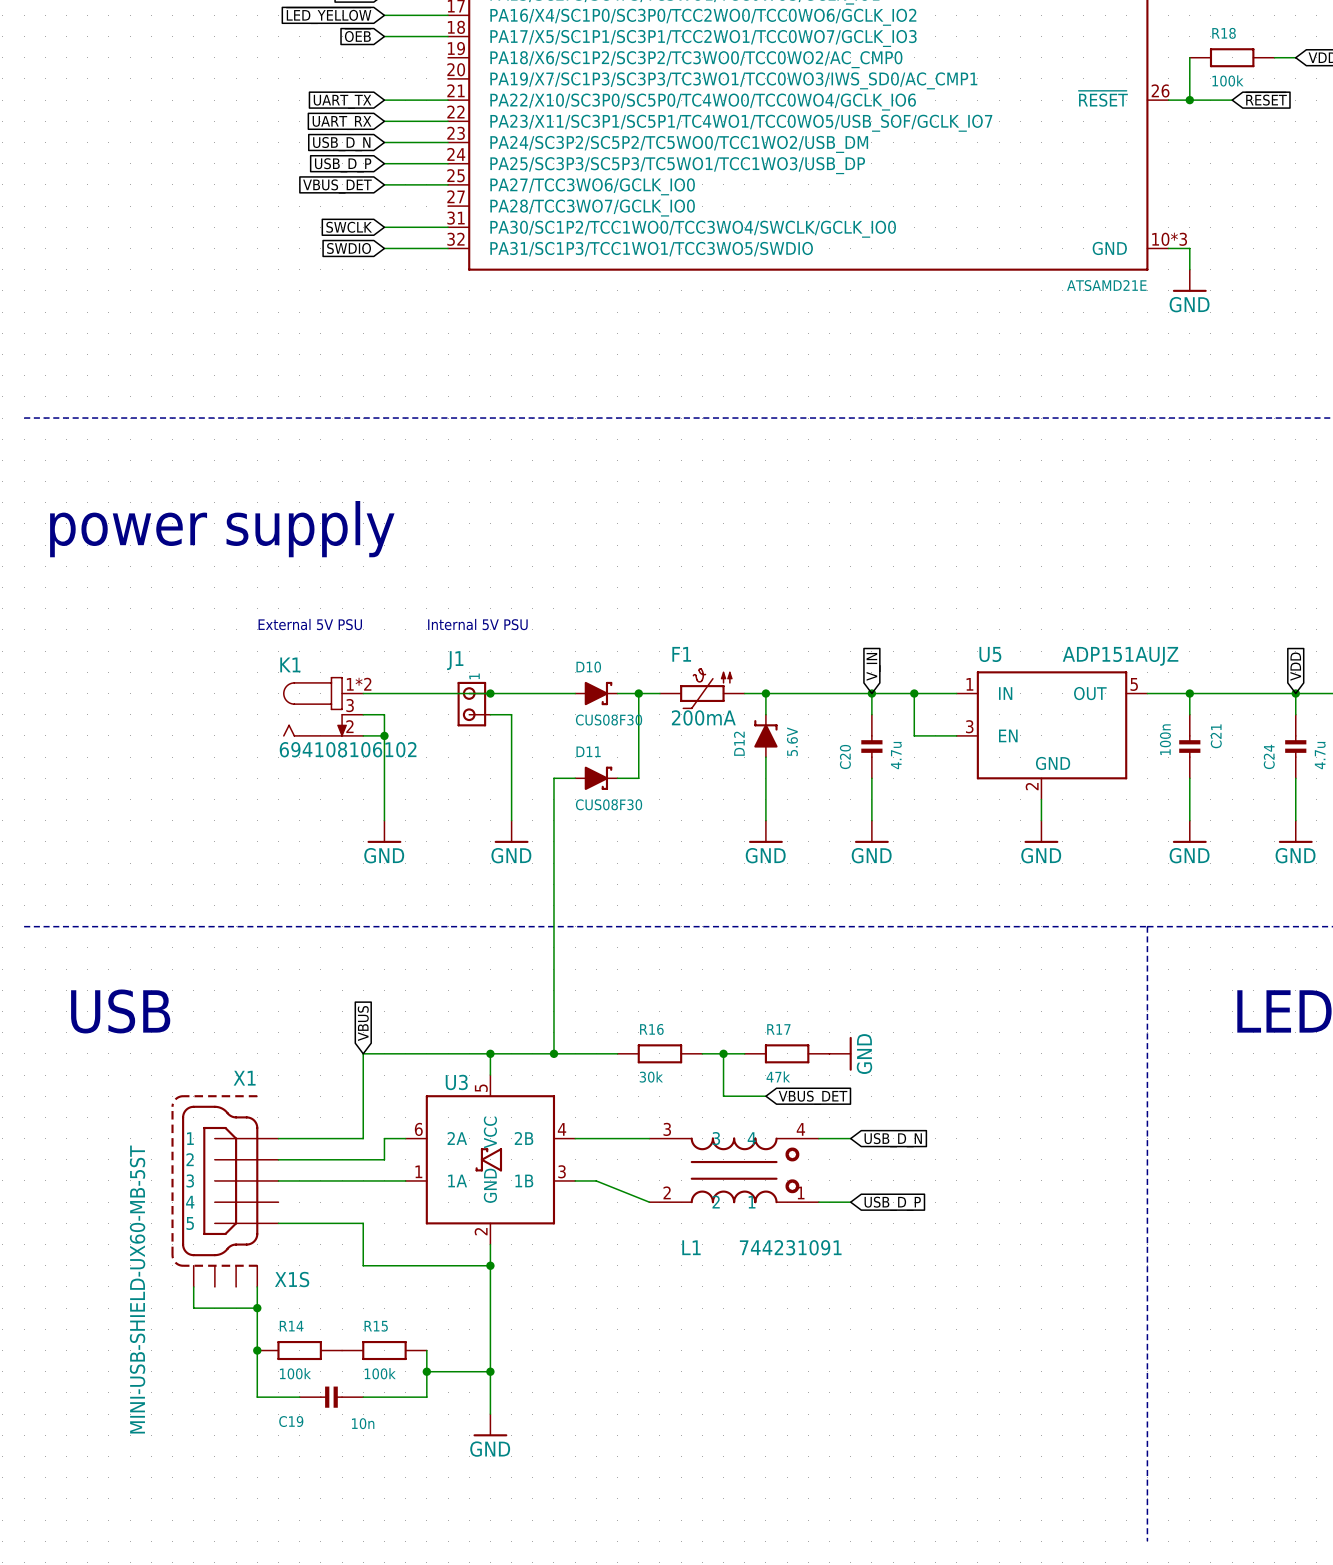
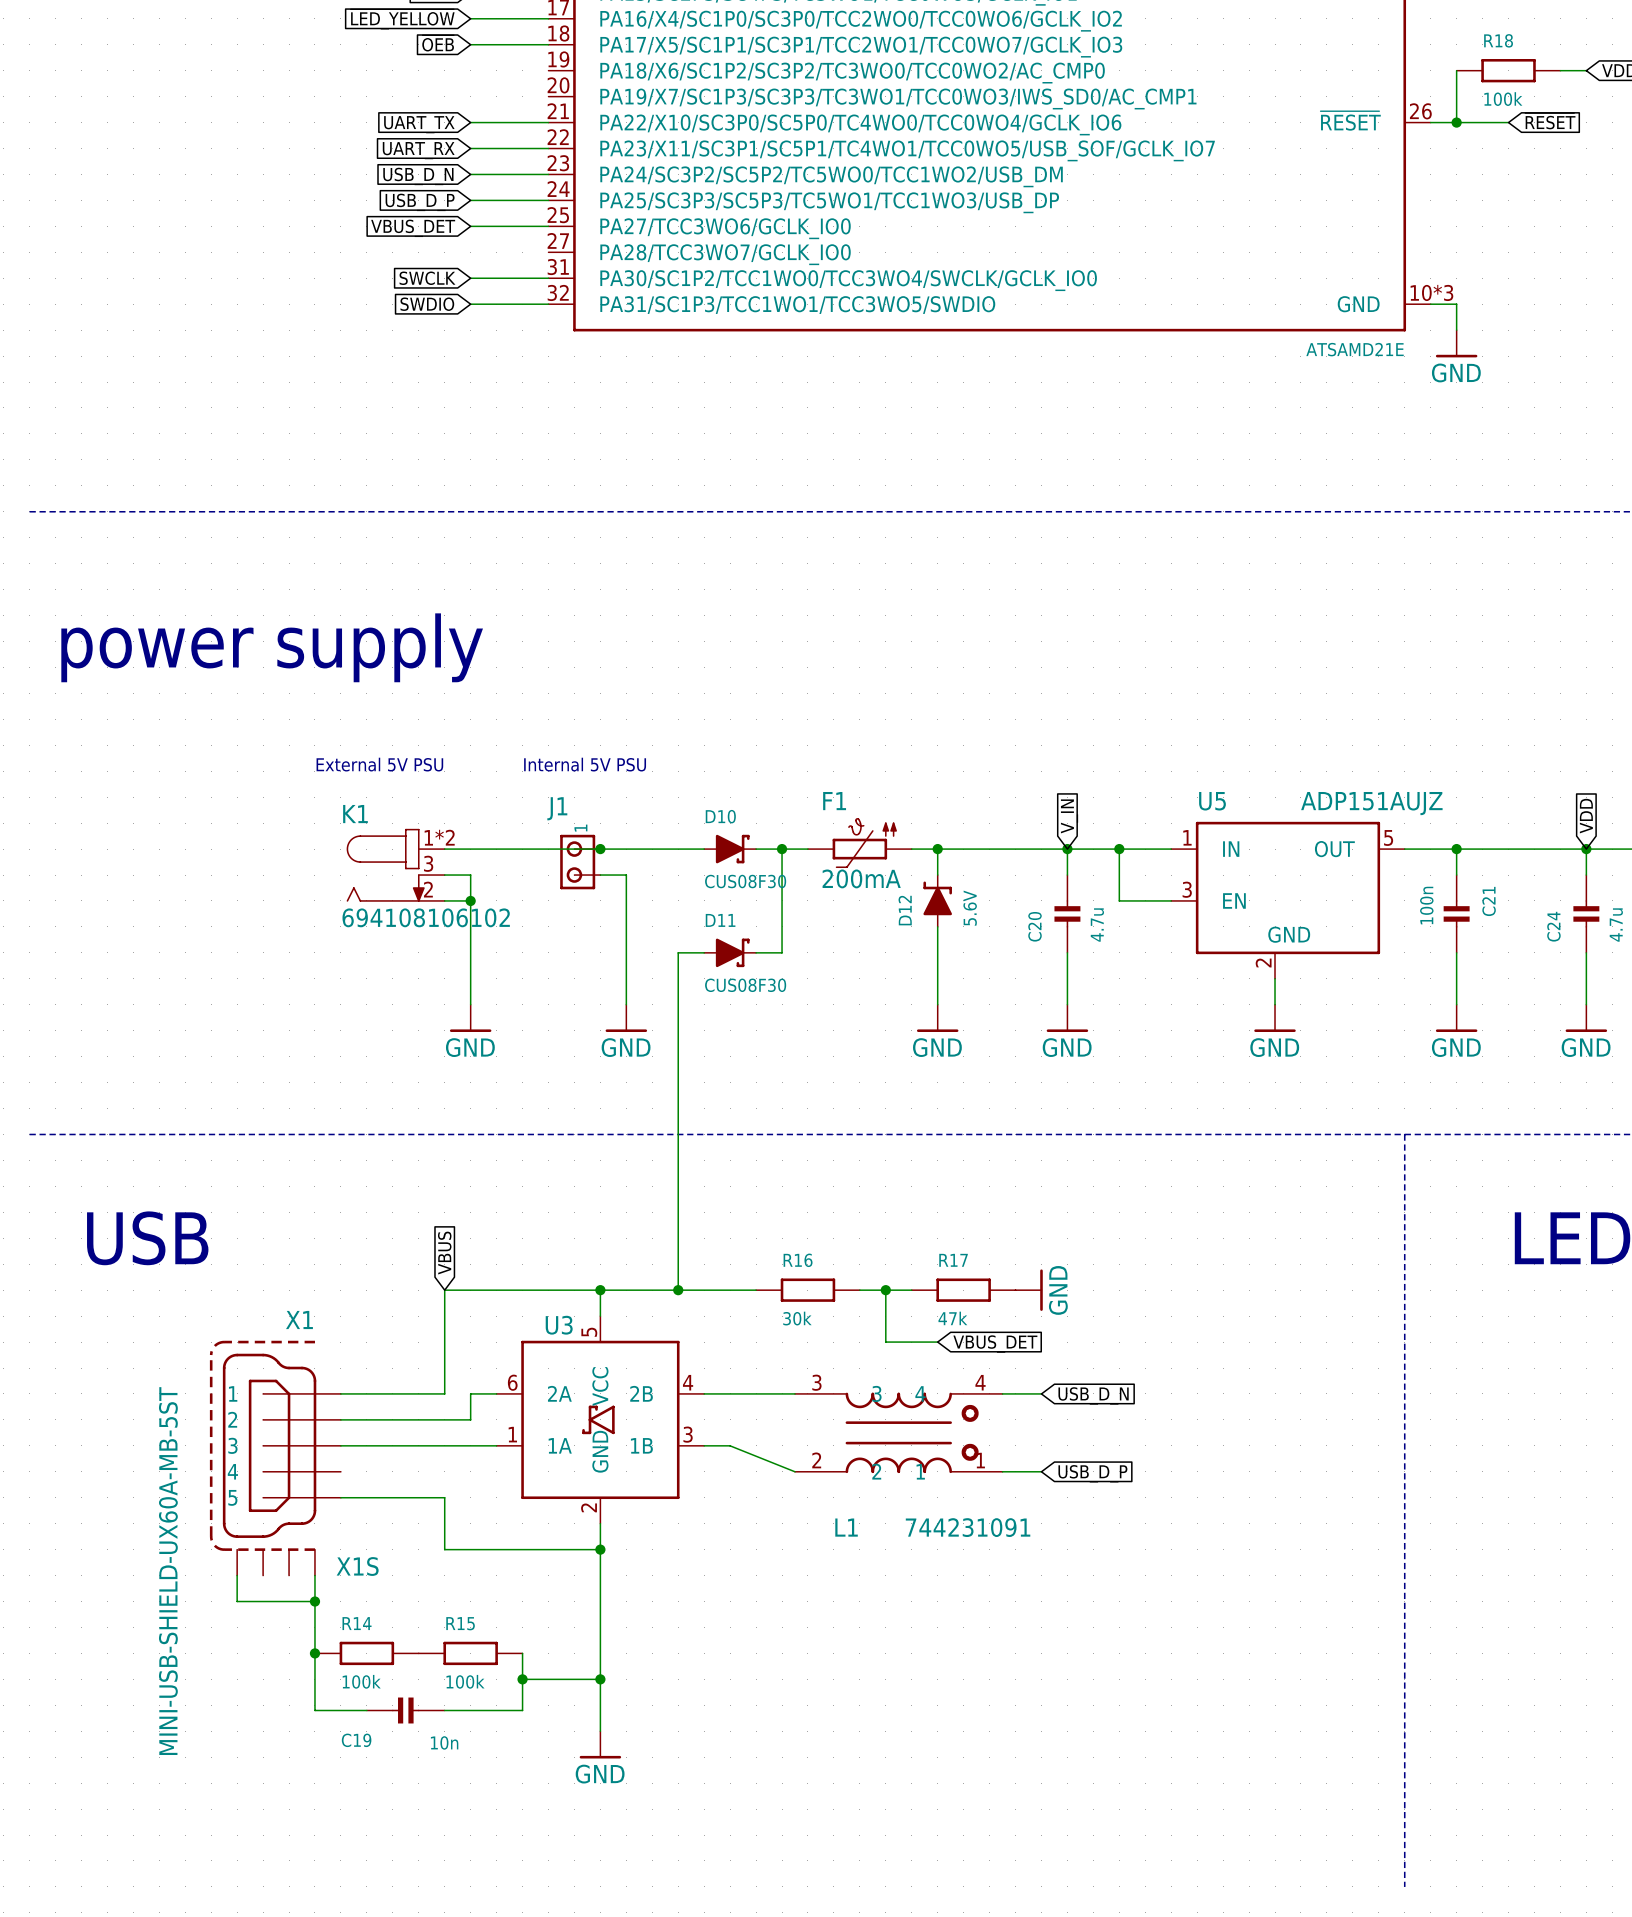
X1 value: MINI-USB-SHIELD-UX60-MB-5ST (137, 1289) -> MINI-USB-SHIELD-UX60A-MB-5ST (168, 1571)

